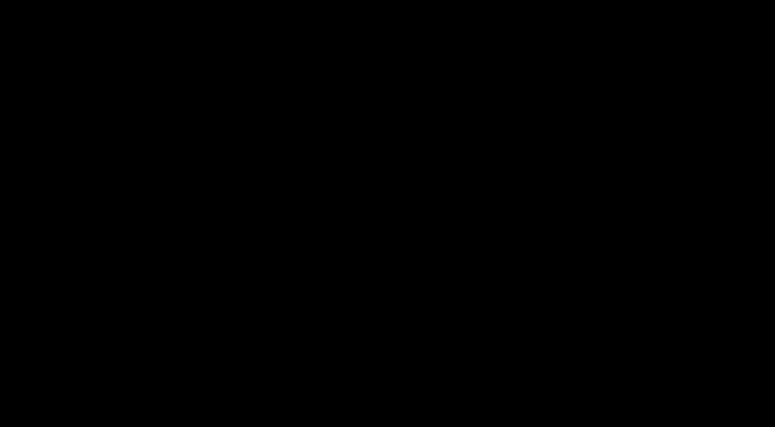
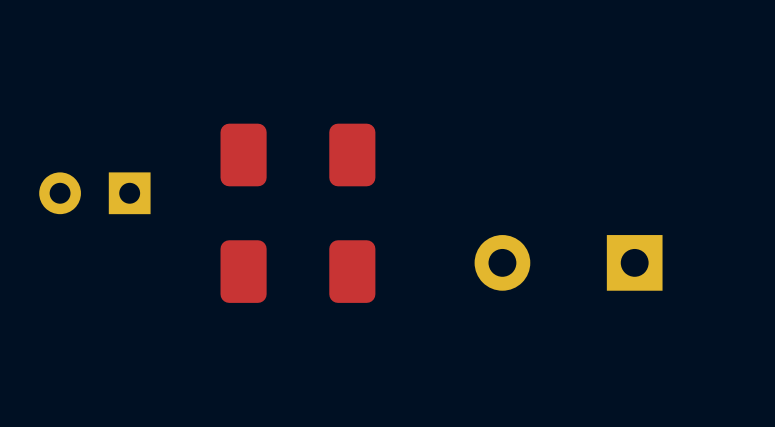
part: none -> (297, 154)
part: none -> (94, 193)
part: none -> (568, 262)
part: none -> (297, 271)

